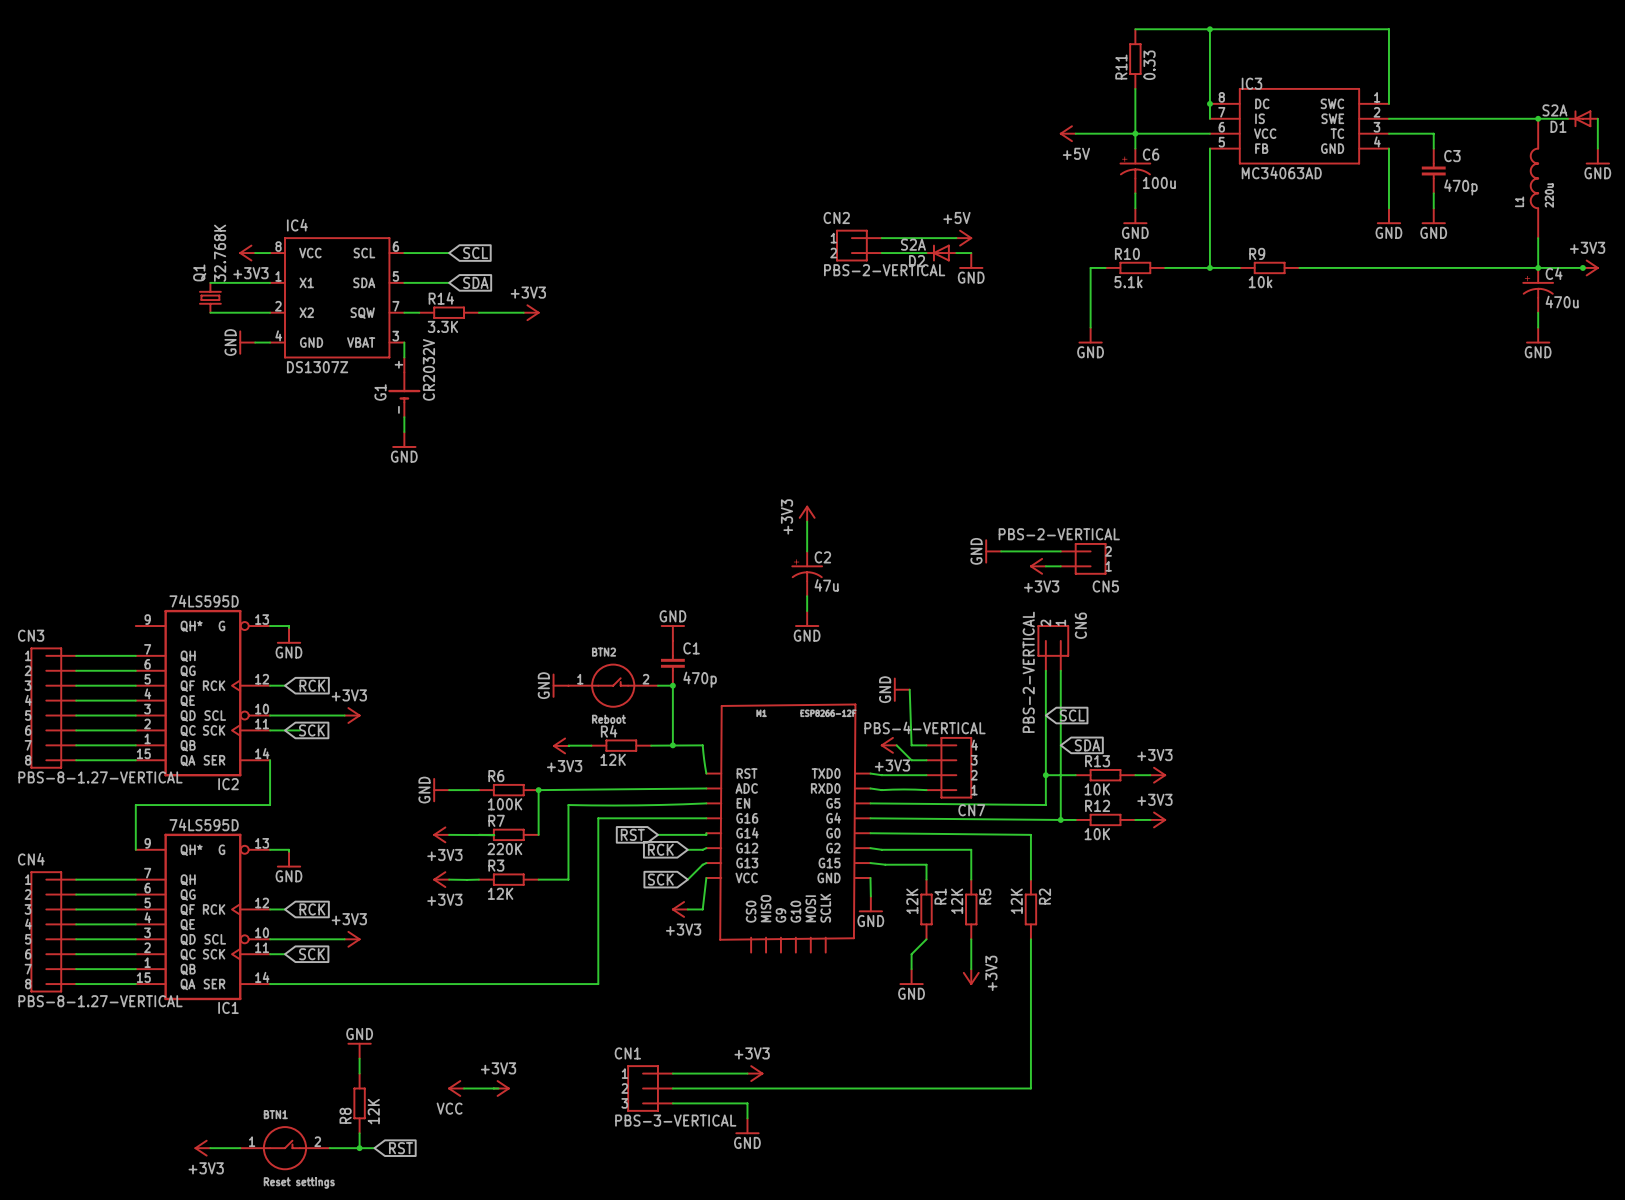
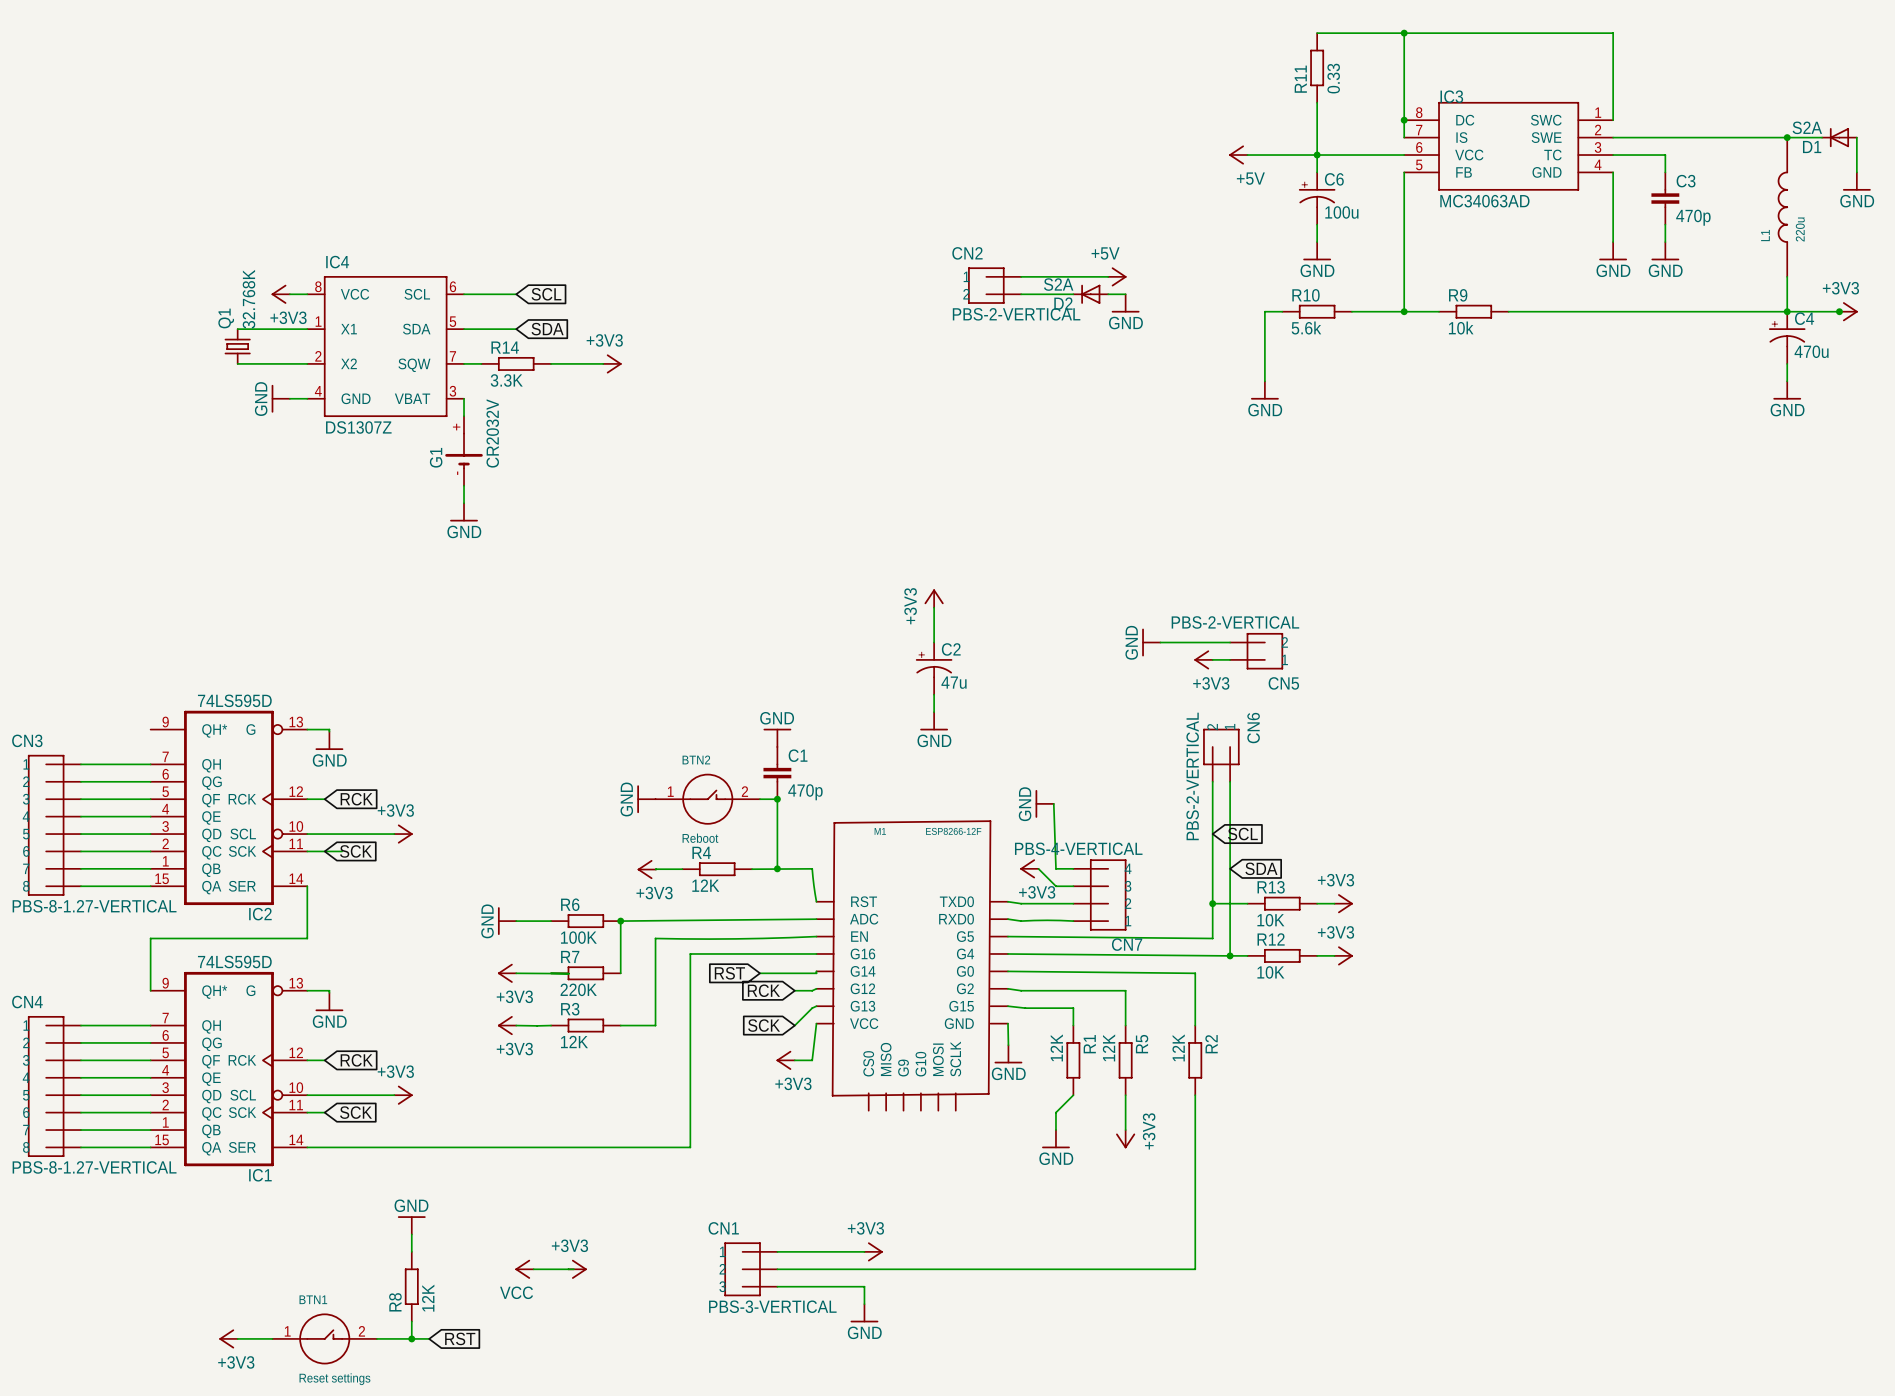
R10 value: 5.1k (1128, 282) -> 5.6k (1306, 328)

